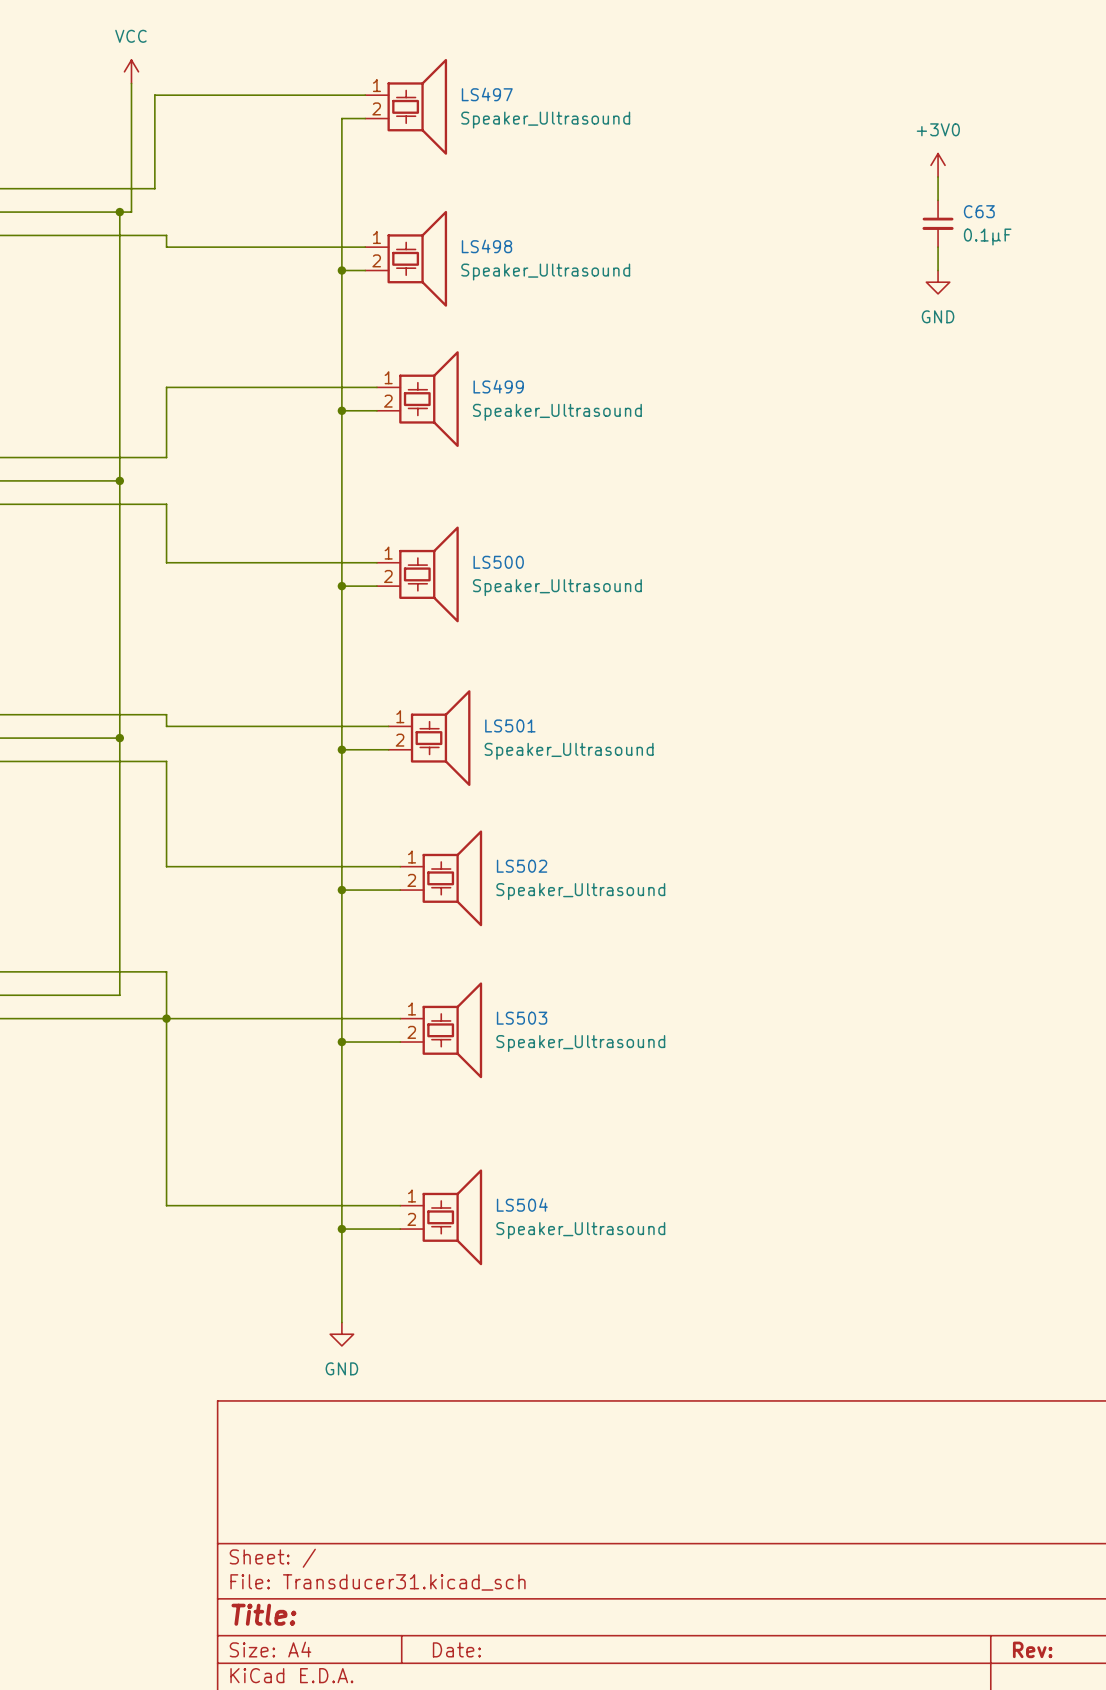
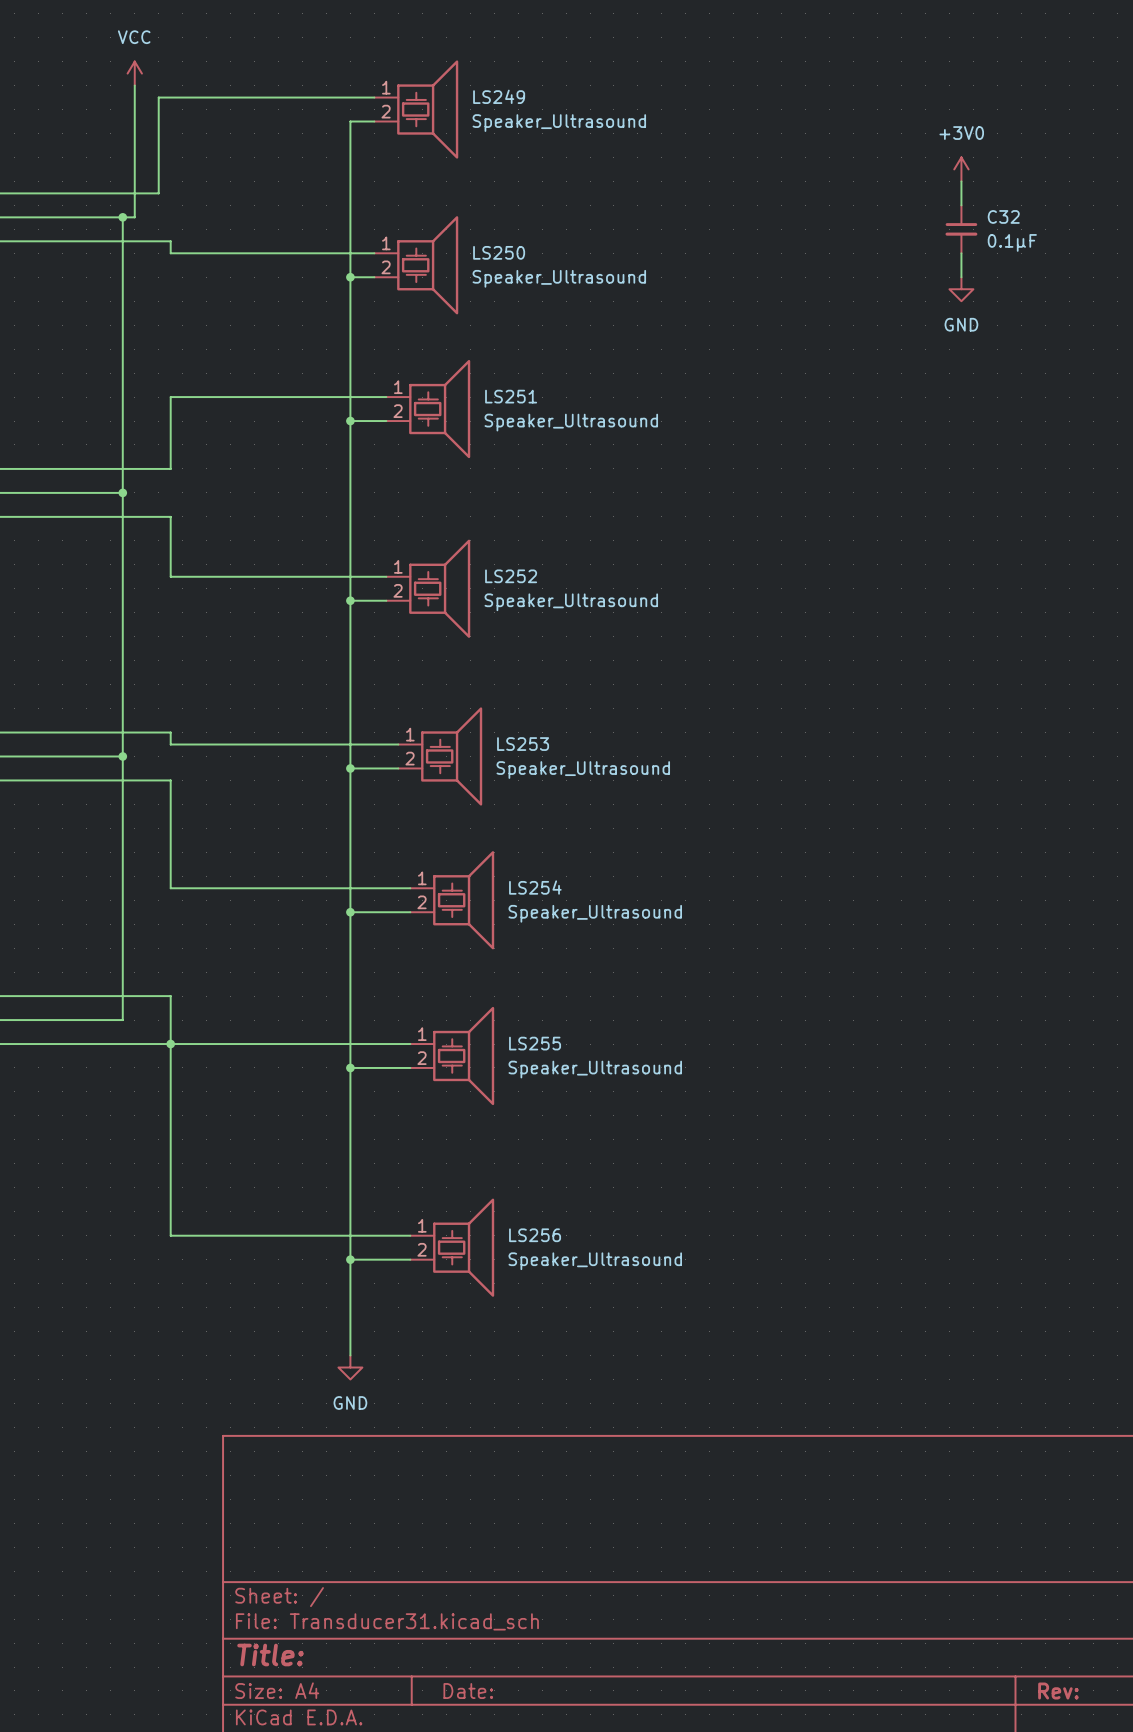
LS497 name: LS497 (487, 94) -> LS249 (499, 96)
C63 name: C63 (979, 211) -> C32 (1003, 216)
LS498 name: LS498 (486, 246) -> LS250 (499, 252)
LS499 name: LS499 (498, 386) -> LS251 (511, 396)
LS500 name: LS500 (498, 562) -> LS252 (511, 576)
LS501 name: LS501 (510, 725) -> LS253 (523, 744)
LS502 name: LS502 (522, 866) -> LS254 (535, 887)
LS503 name: LS503 (522, 1018) -> LS255 (535, 1043)
LS504 name: LS504 (522, 1204) -> LS256 (535, 1235)

